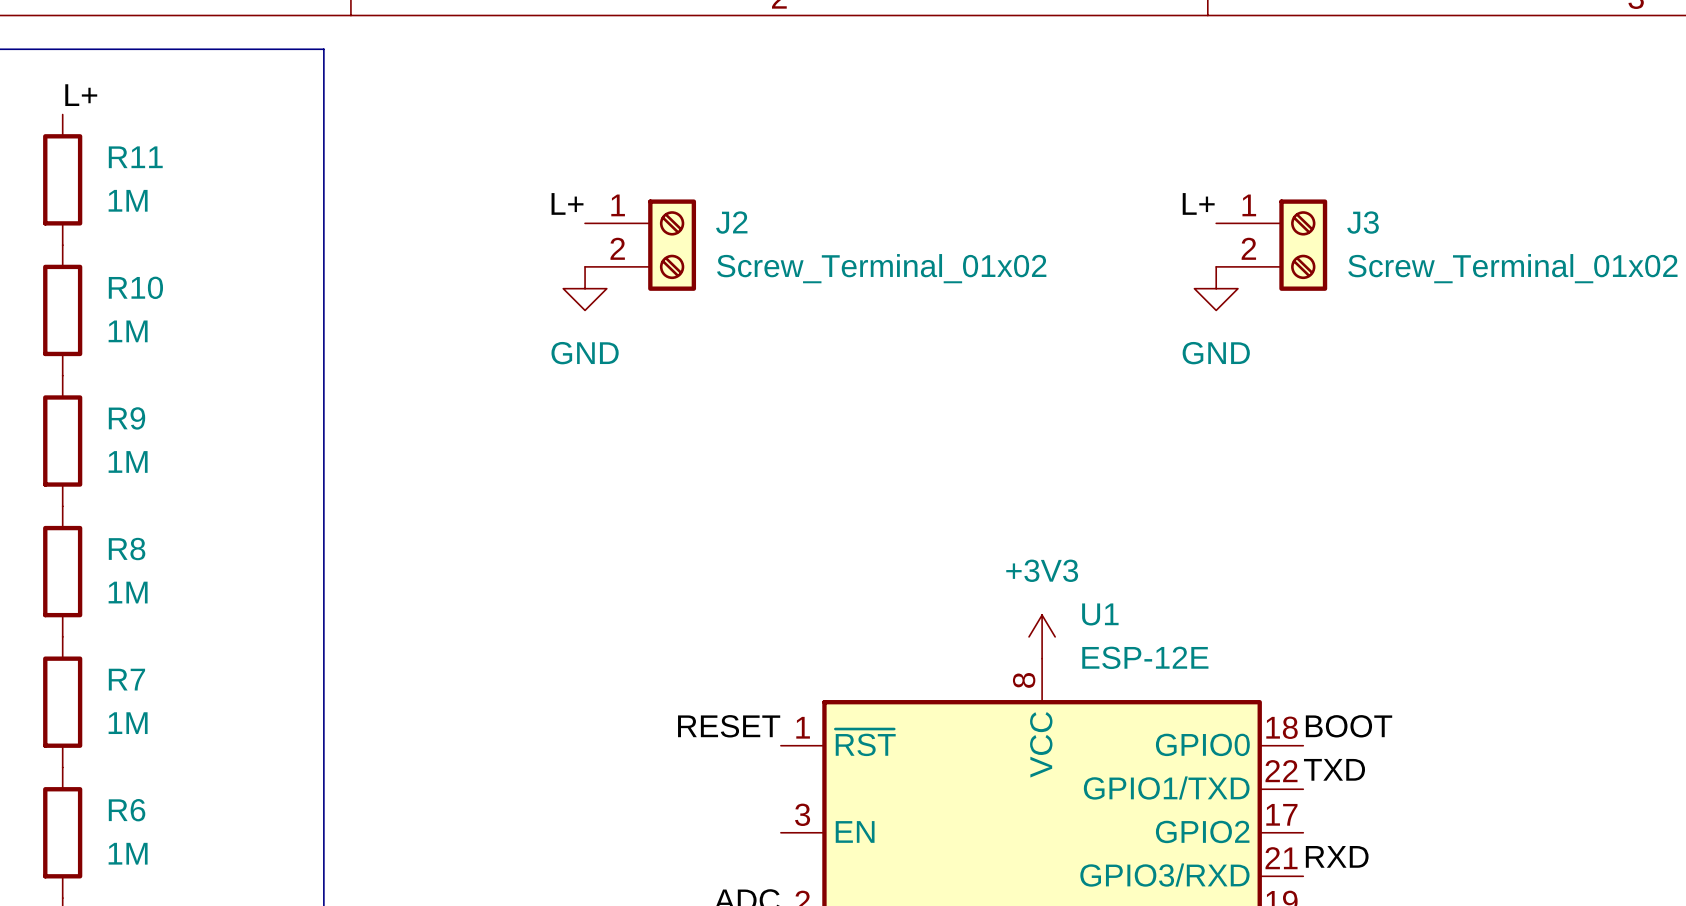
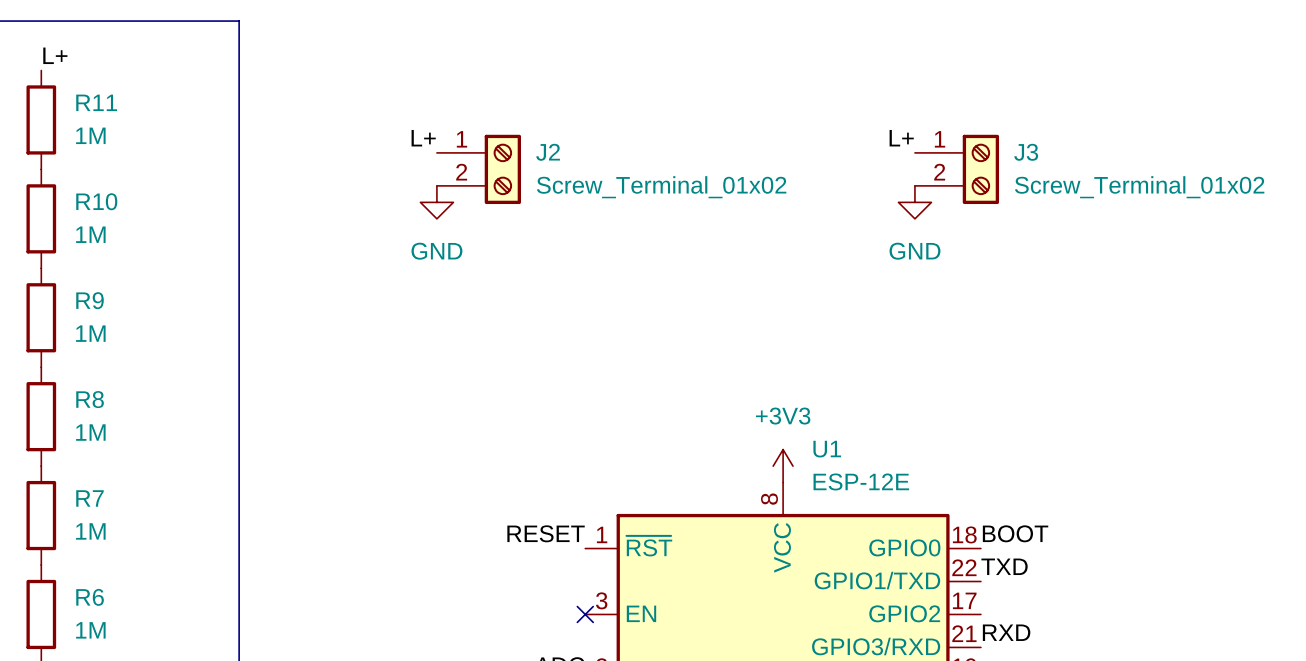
no-connect mark: none -> (585, 614)

